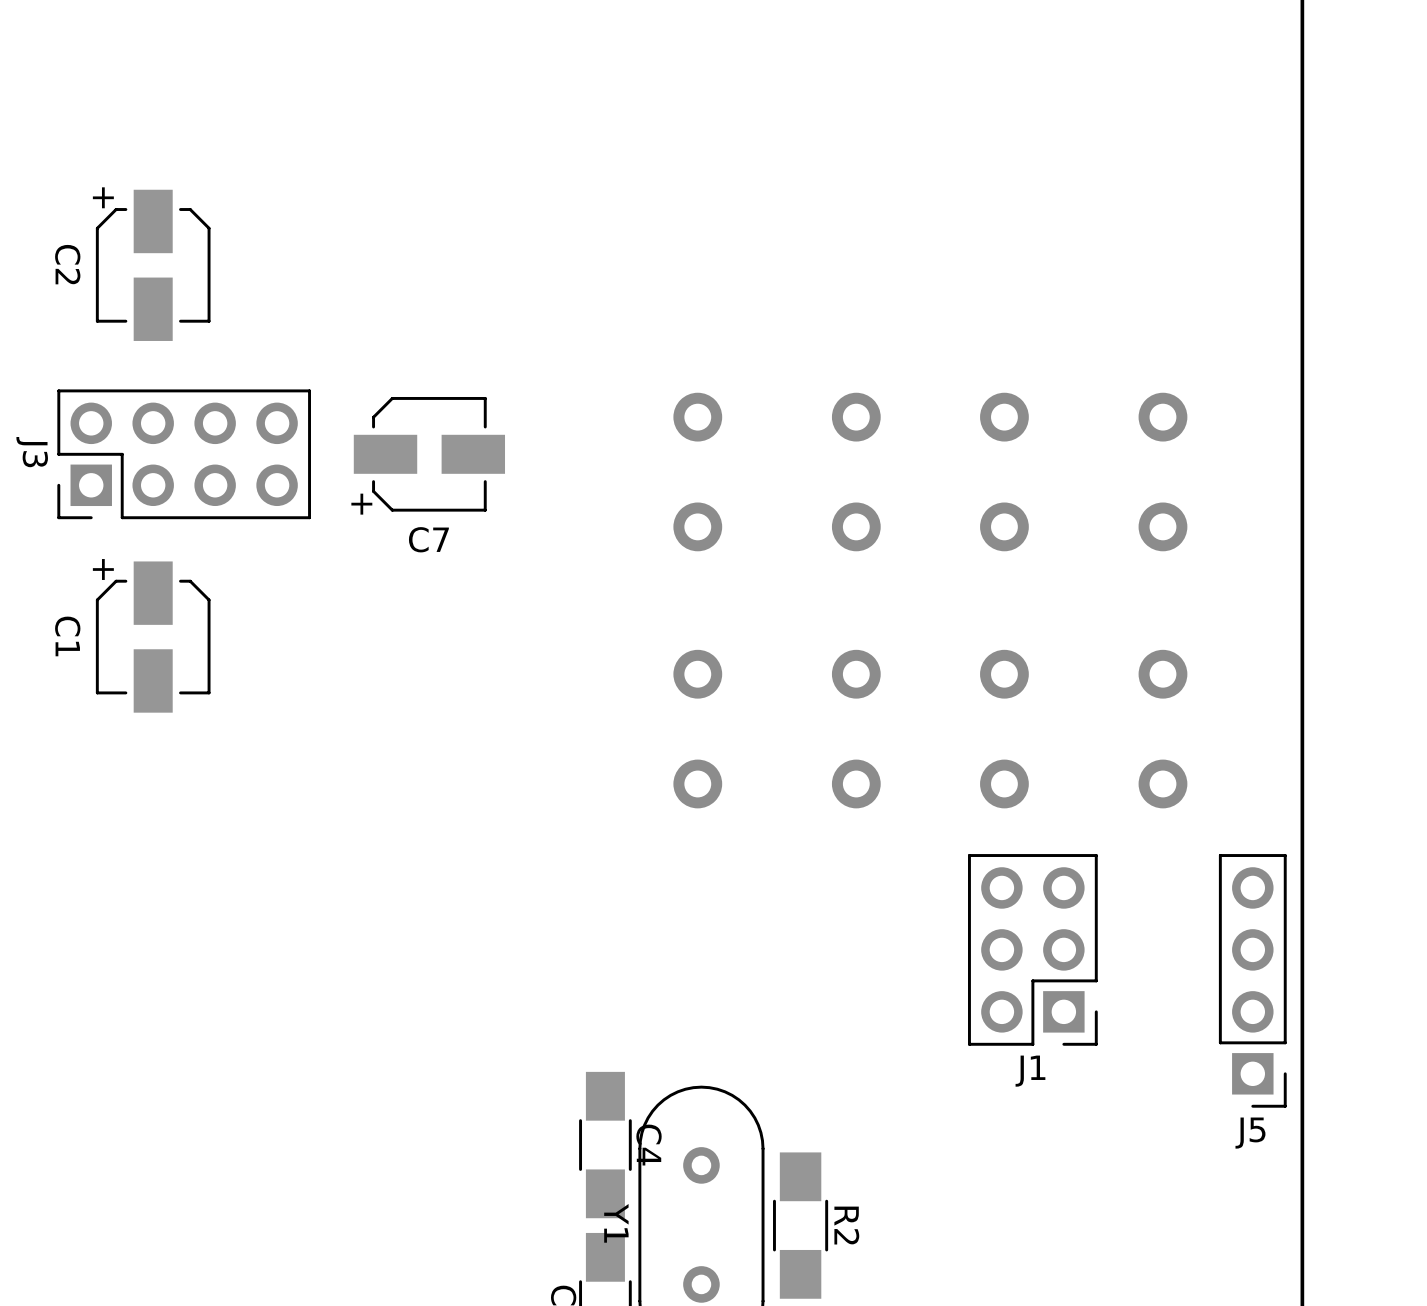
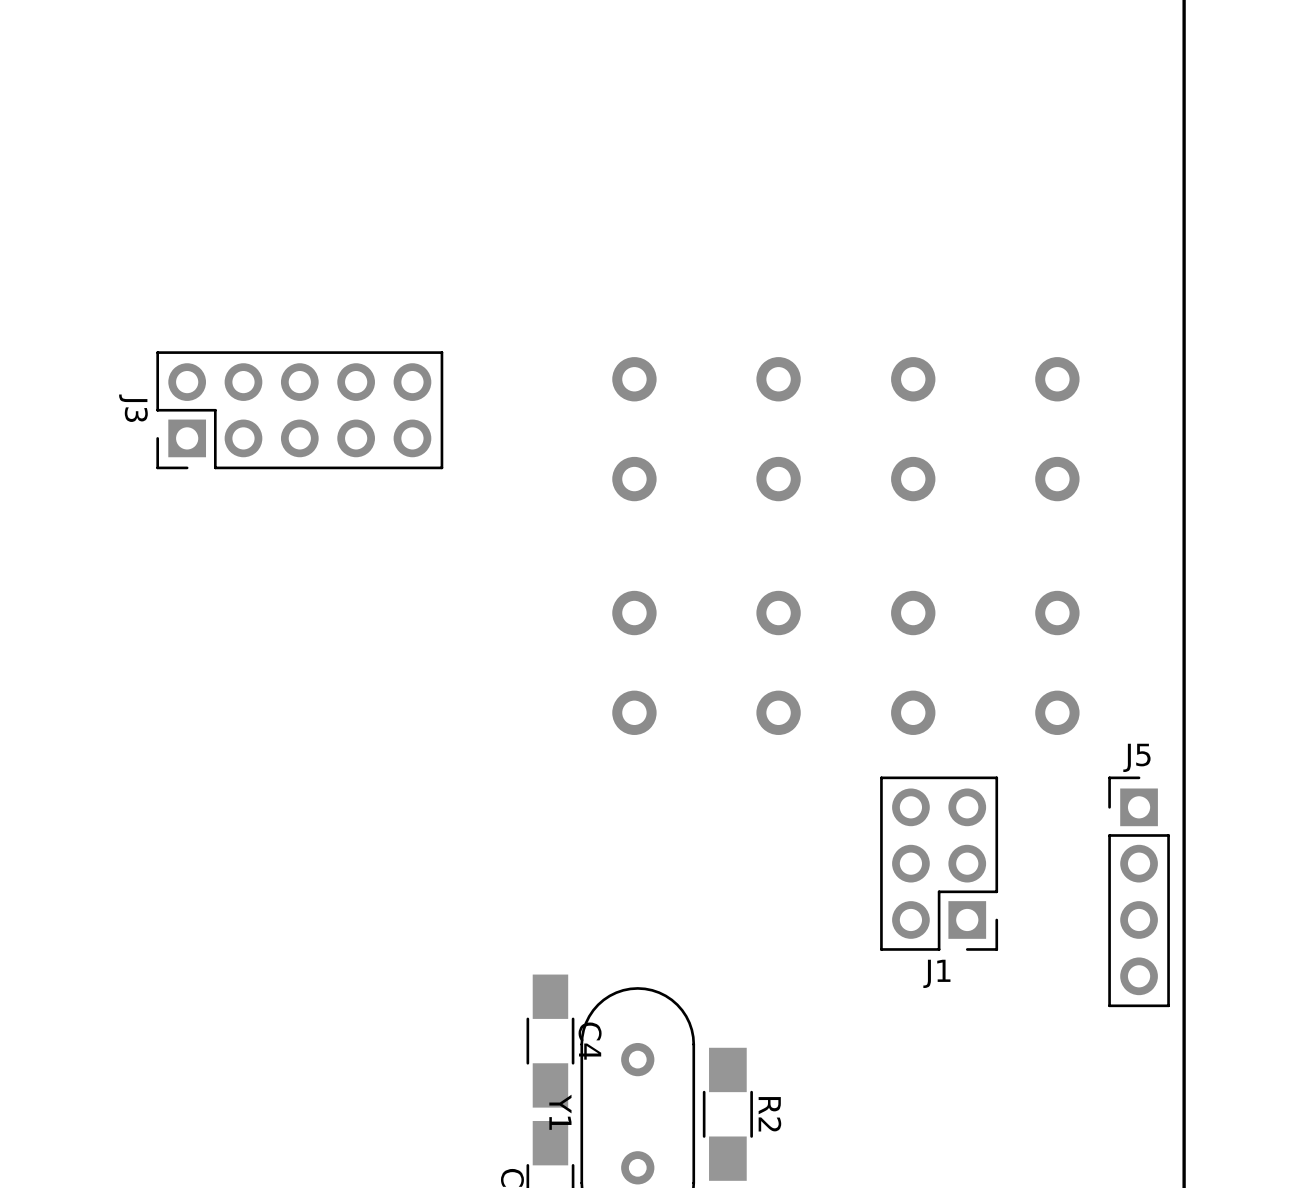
C2: (153, 265) -> none
J3 footprint: [57, 389, 311, 520] -> [156, 351, 444, 470]
C7: (429, 454) -> none
C1: (153, 637) -> none
J5 rotation: 0° (1252, 980) -> 180° (1139, 891)

